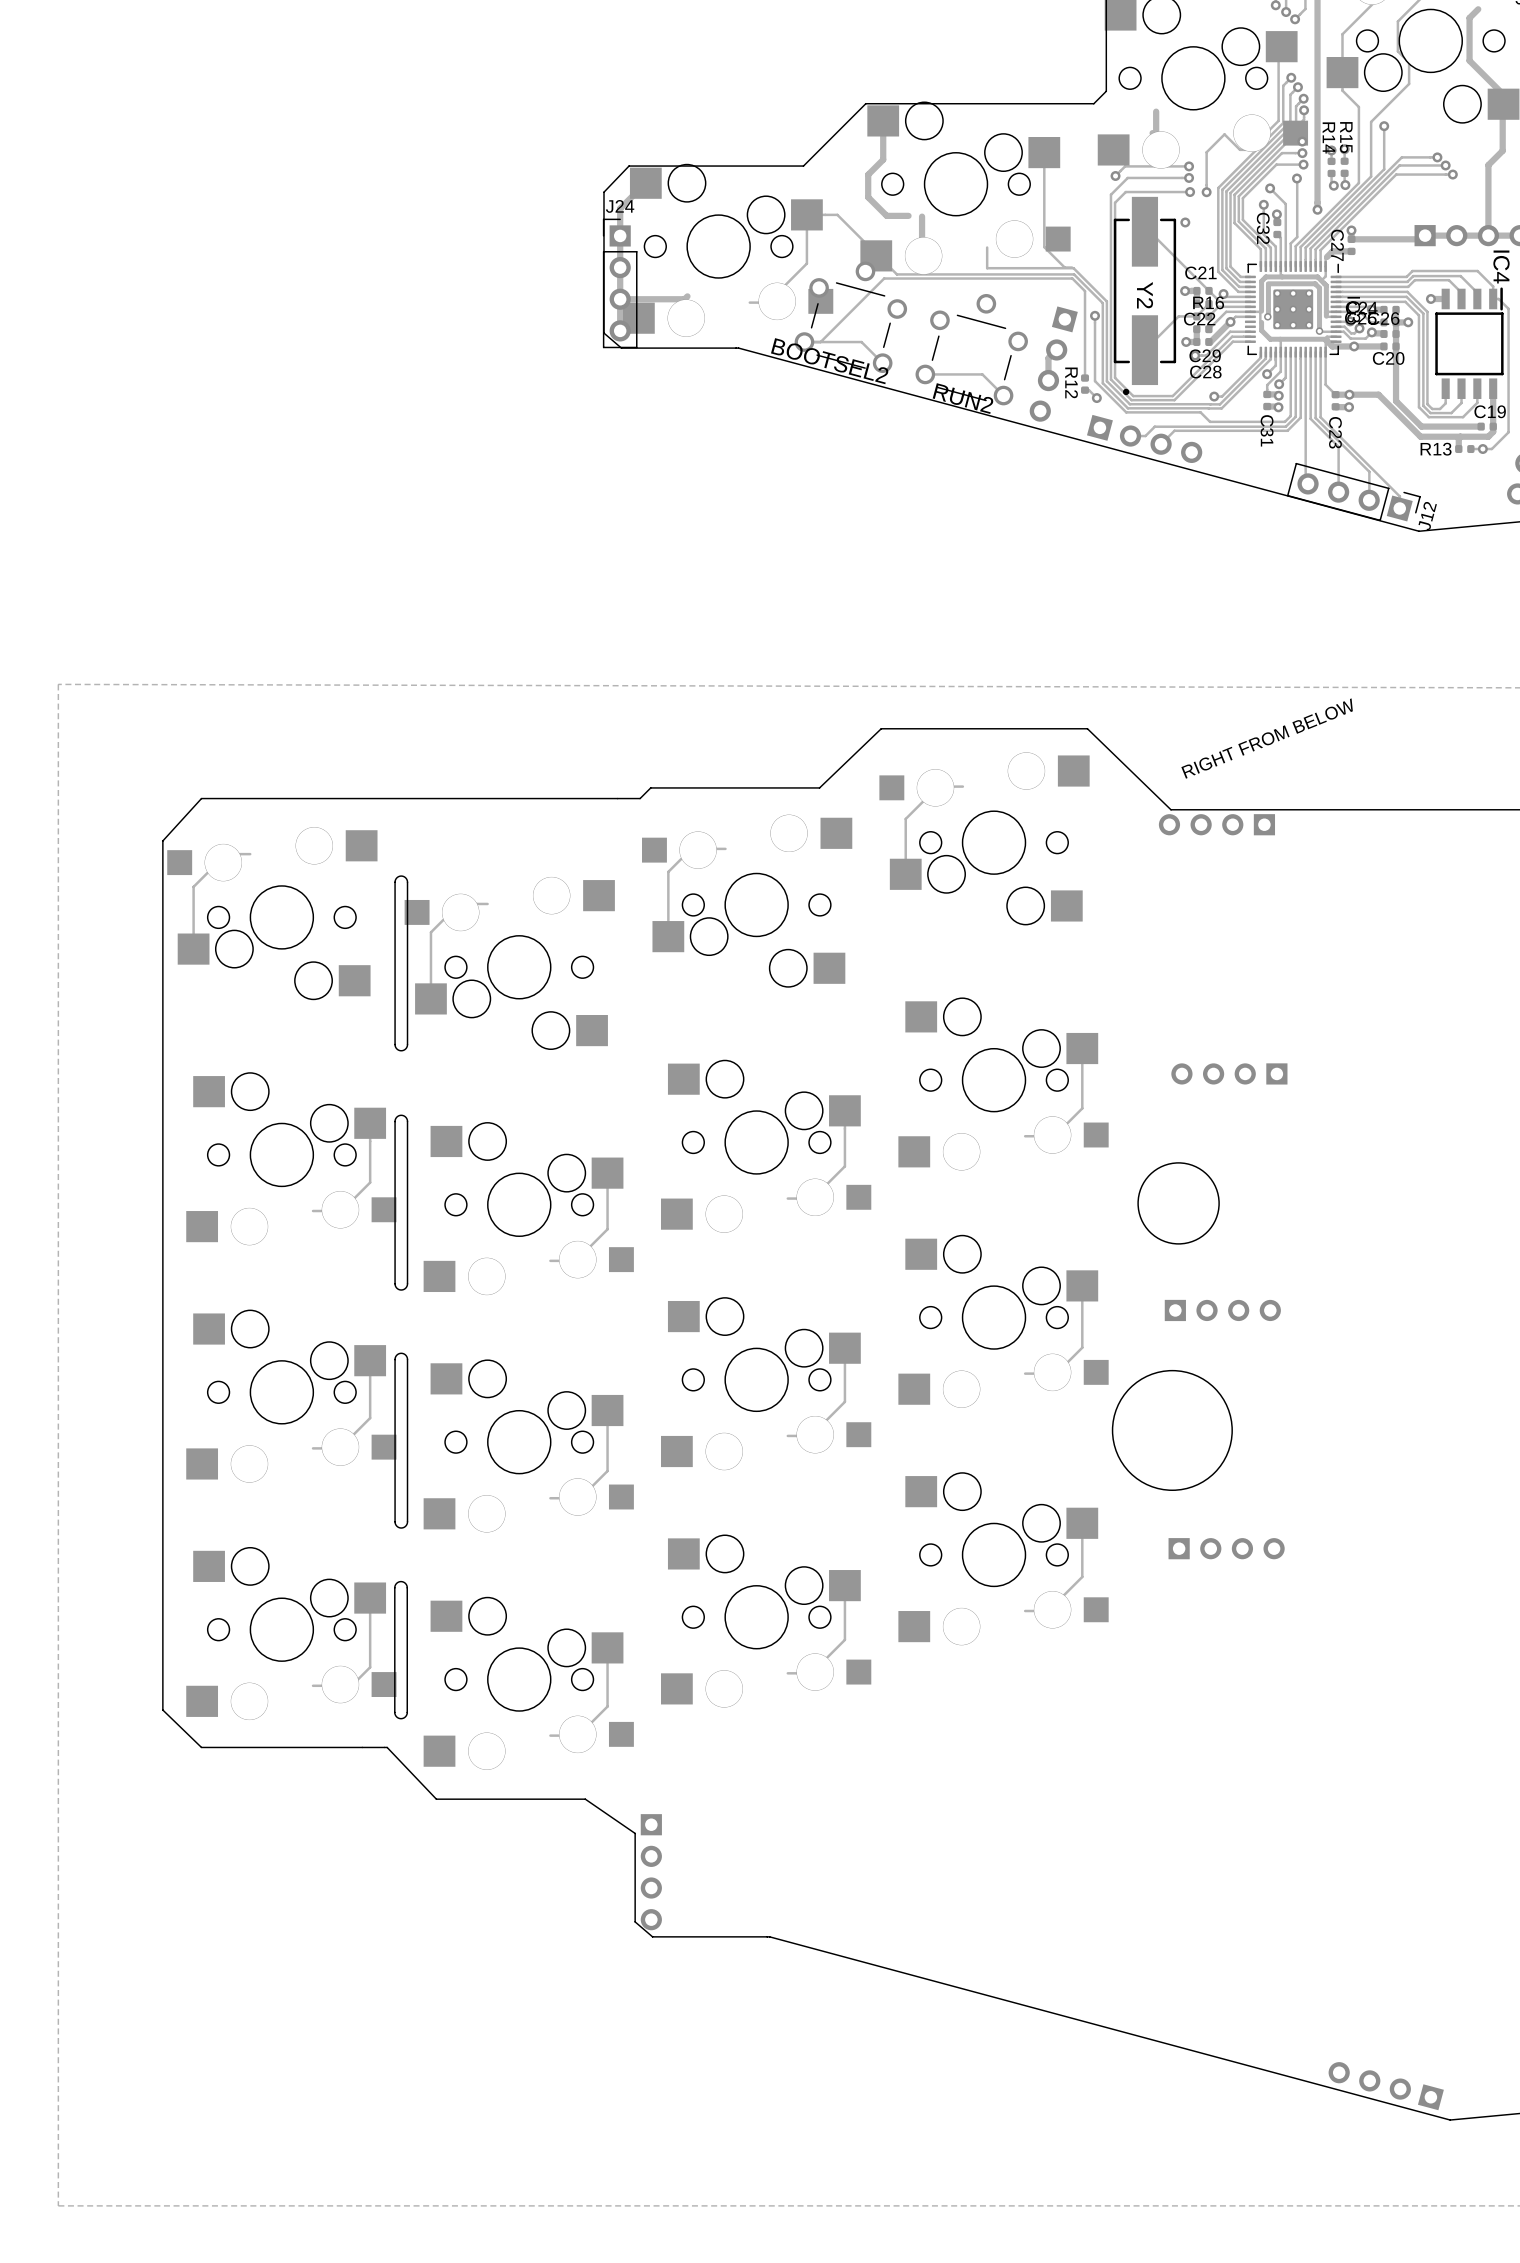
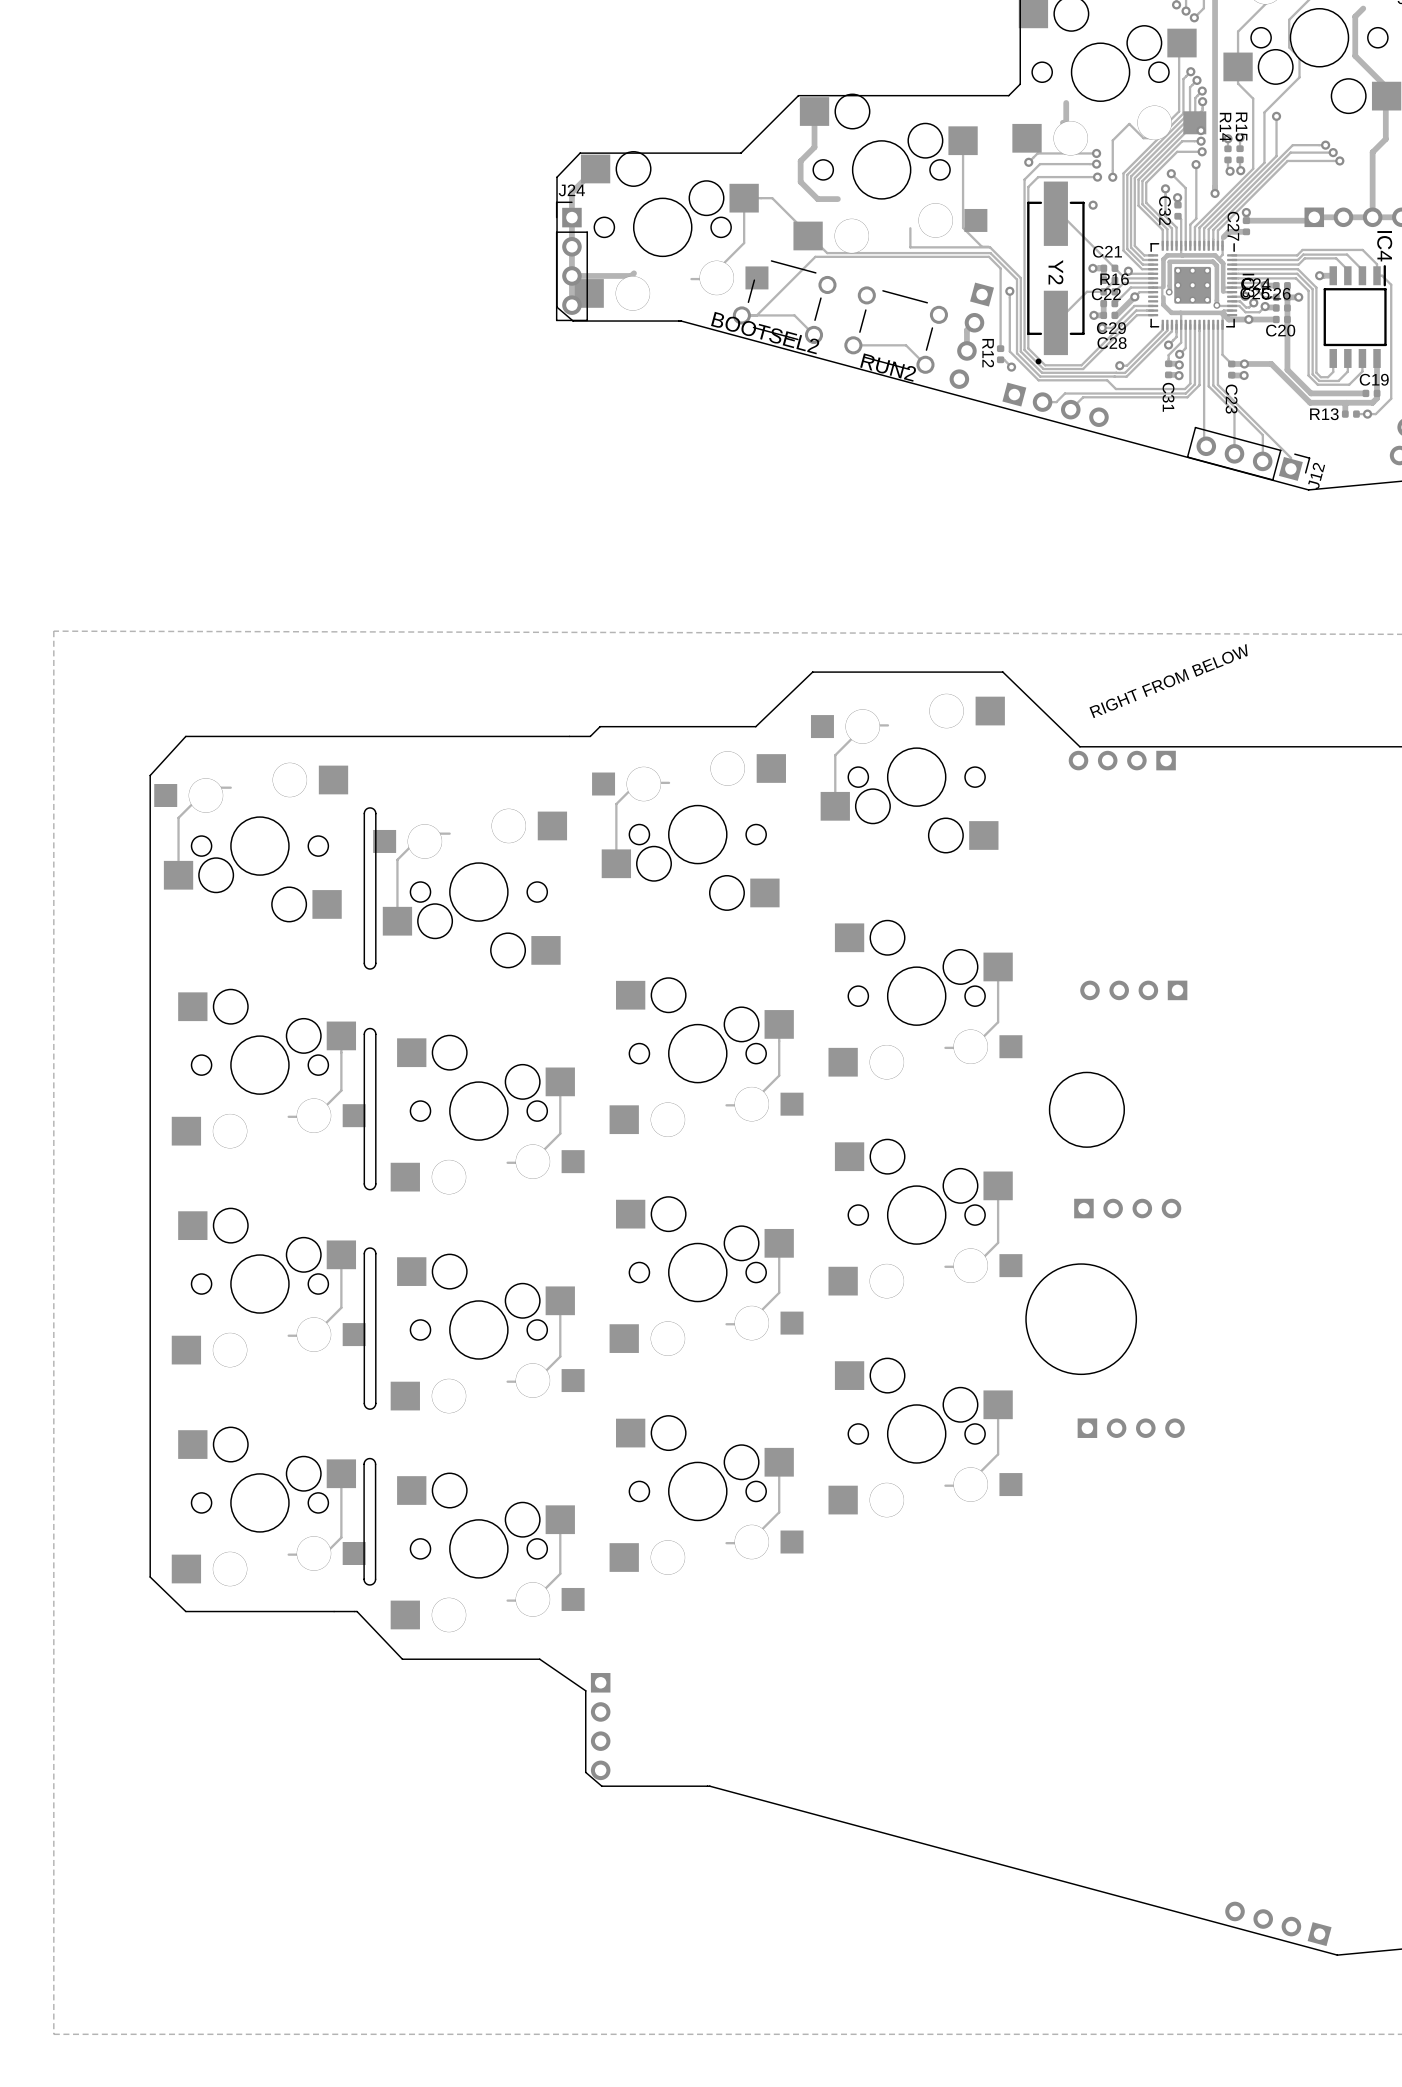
track: (922, 216) (922, 239) -> none
BOOTSEL2 footprint: [794, 261, 908, 373] -> [732, 260, 837, 344]
RUN2 footprint: [915, 293, 1028, 406] -> [844, 286, 948, 374]

